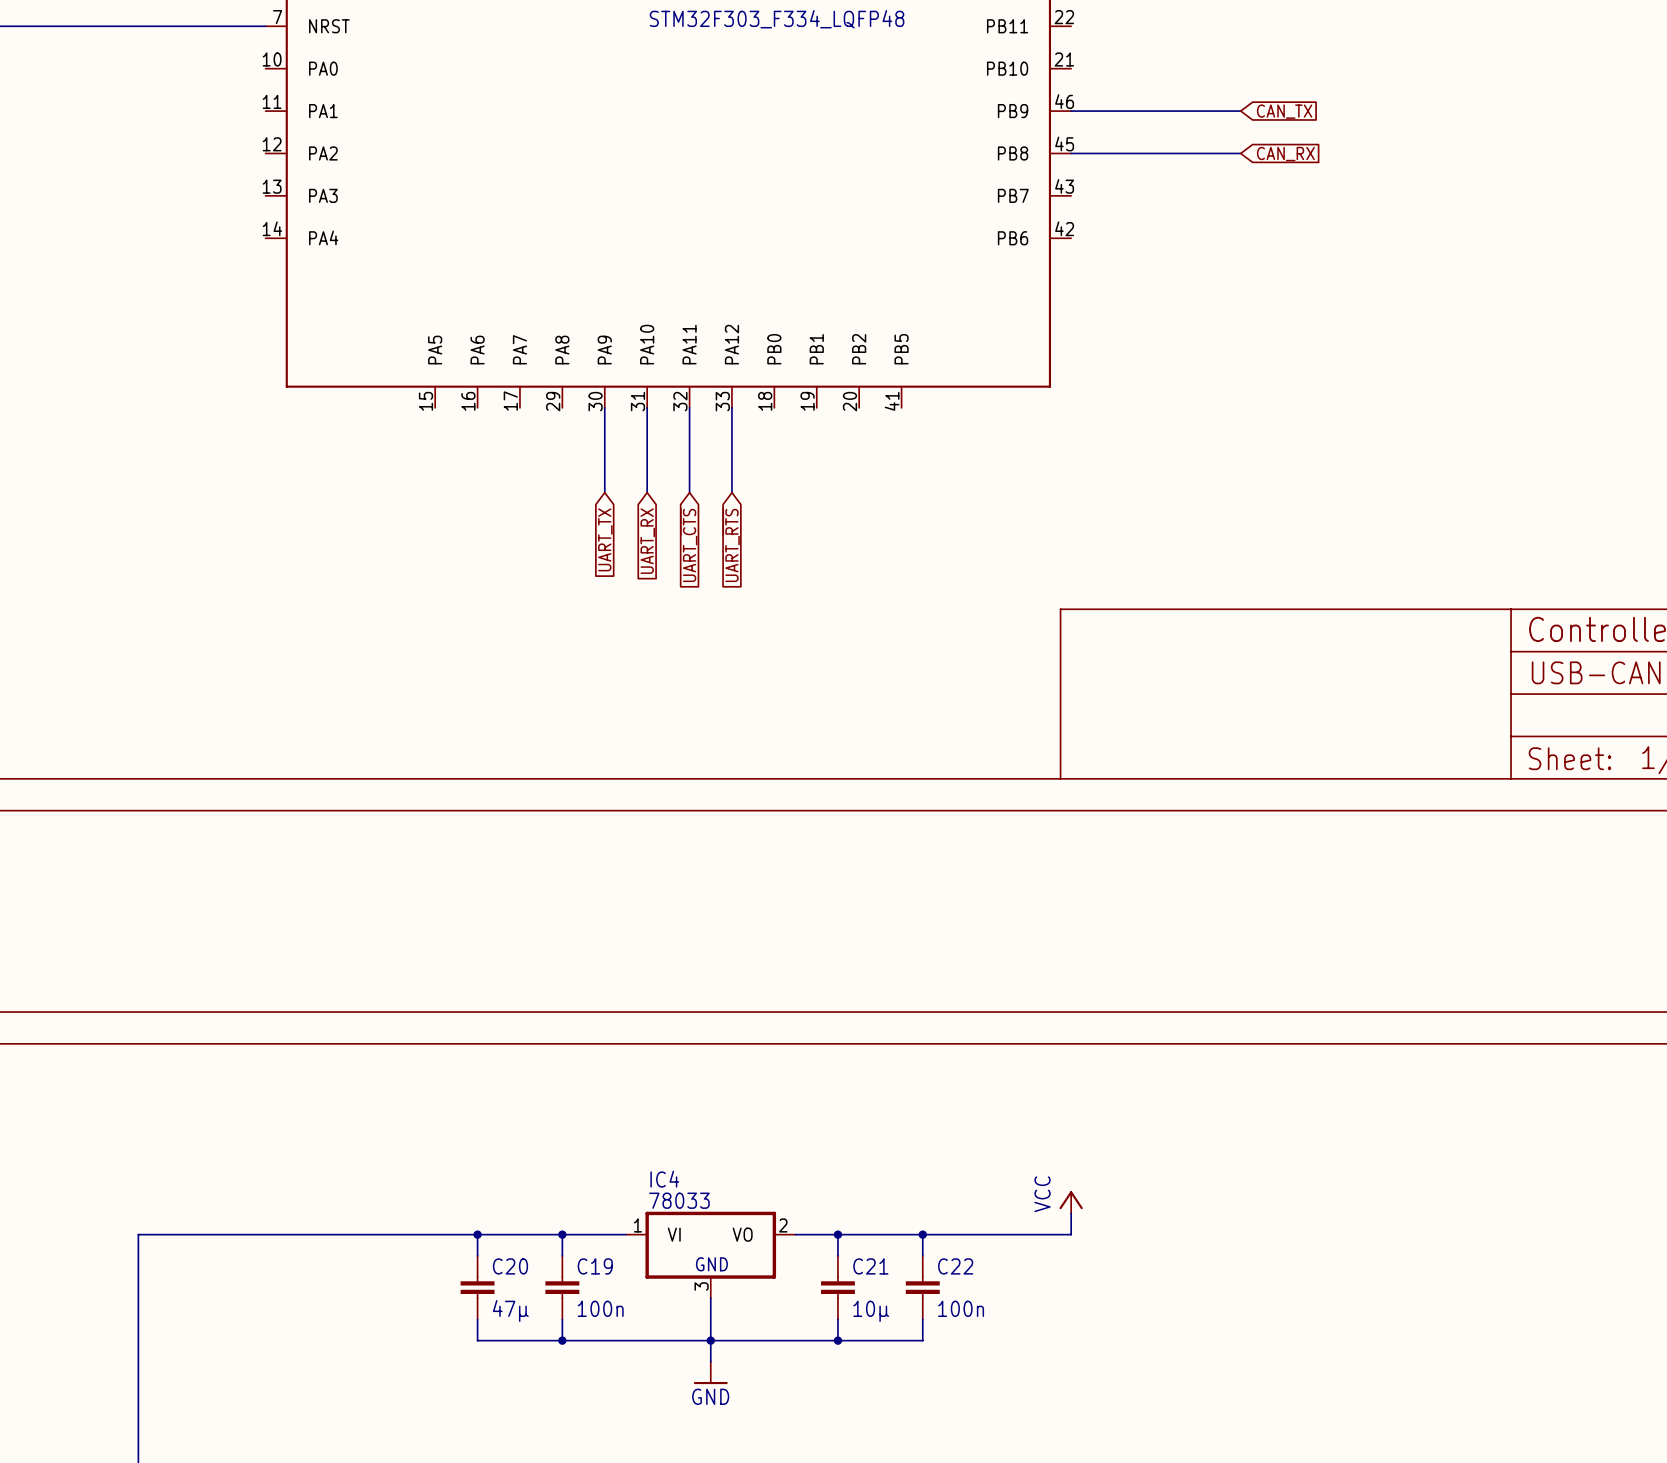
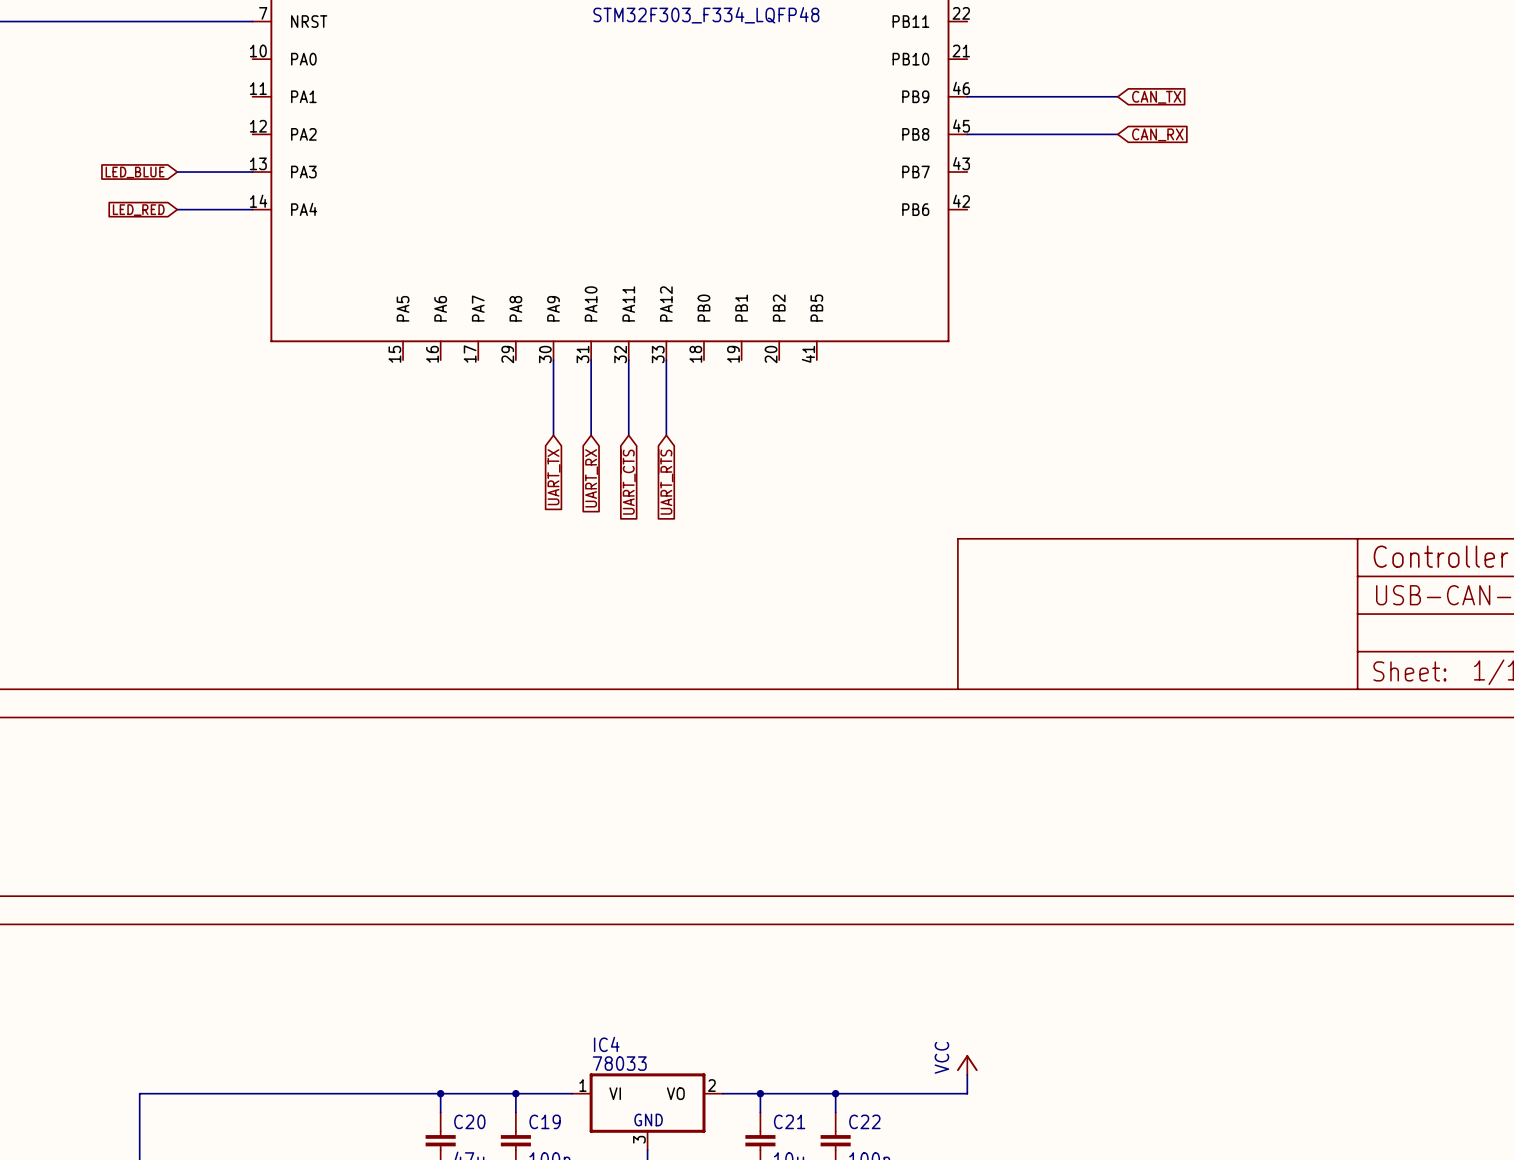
wire: none -> (177, 172) (252, 172)
global label: none -> LED_BLUE (135, 172)
global label: none -> LED_RED (138, 210)
wire: none -> (177, 209) (252, 209)

